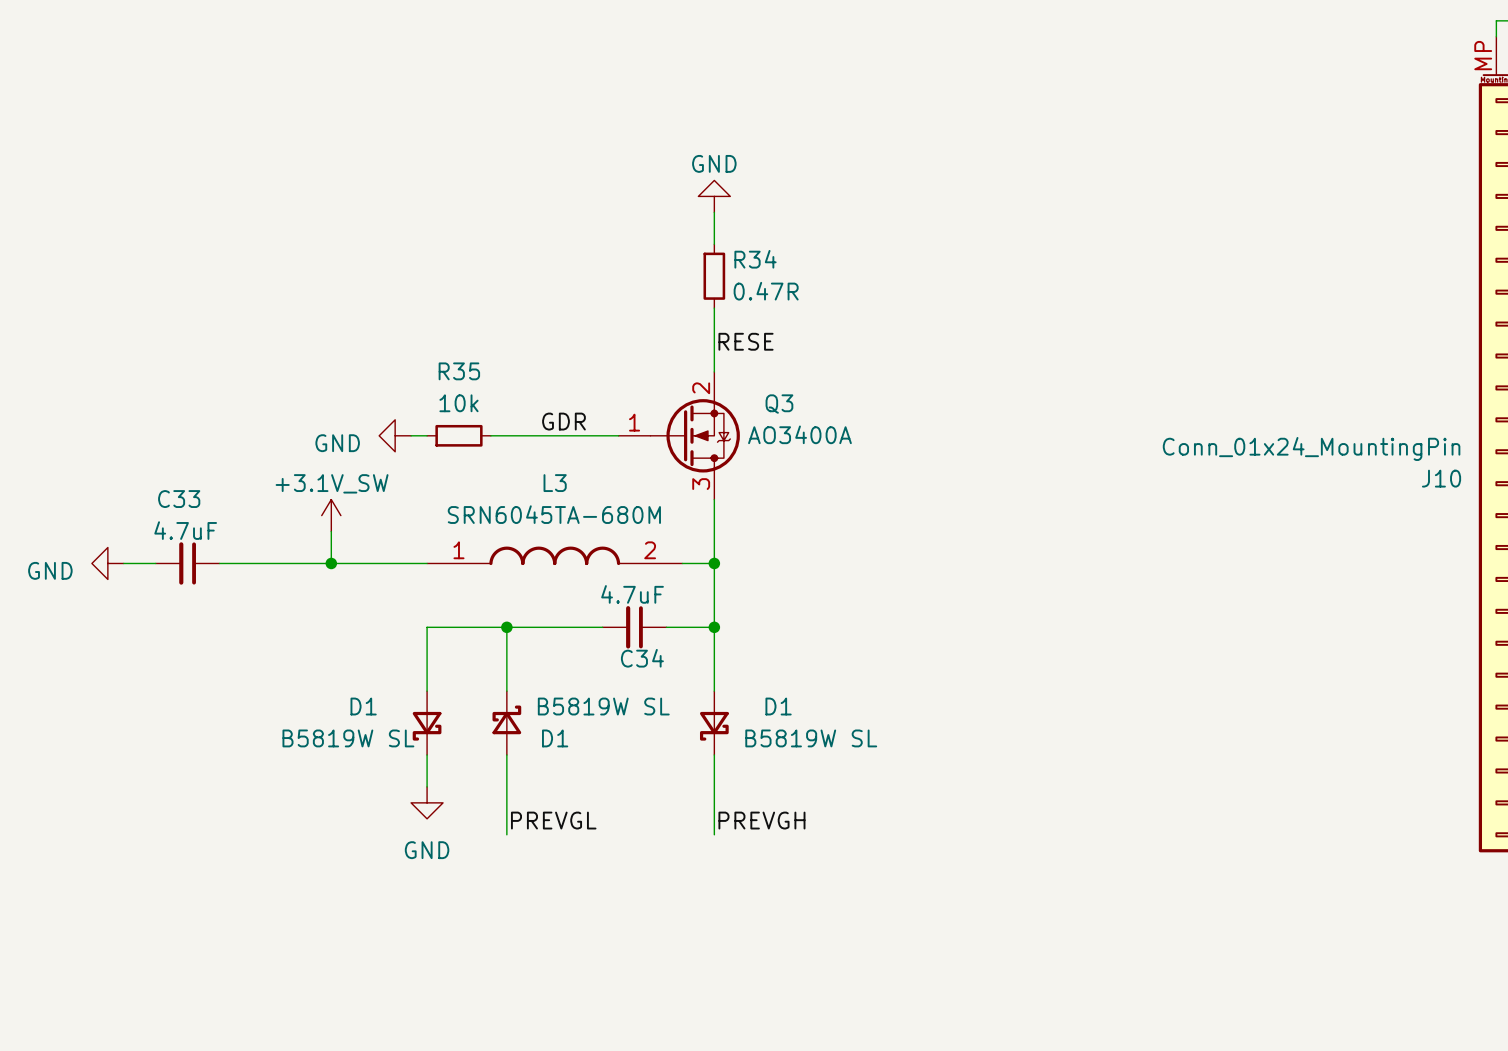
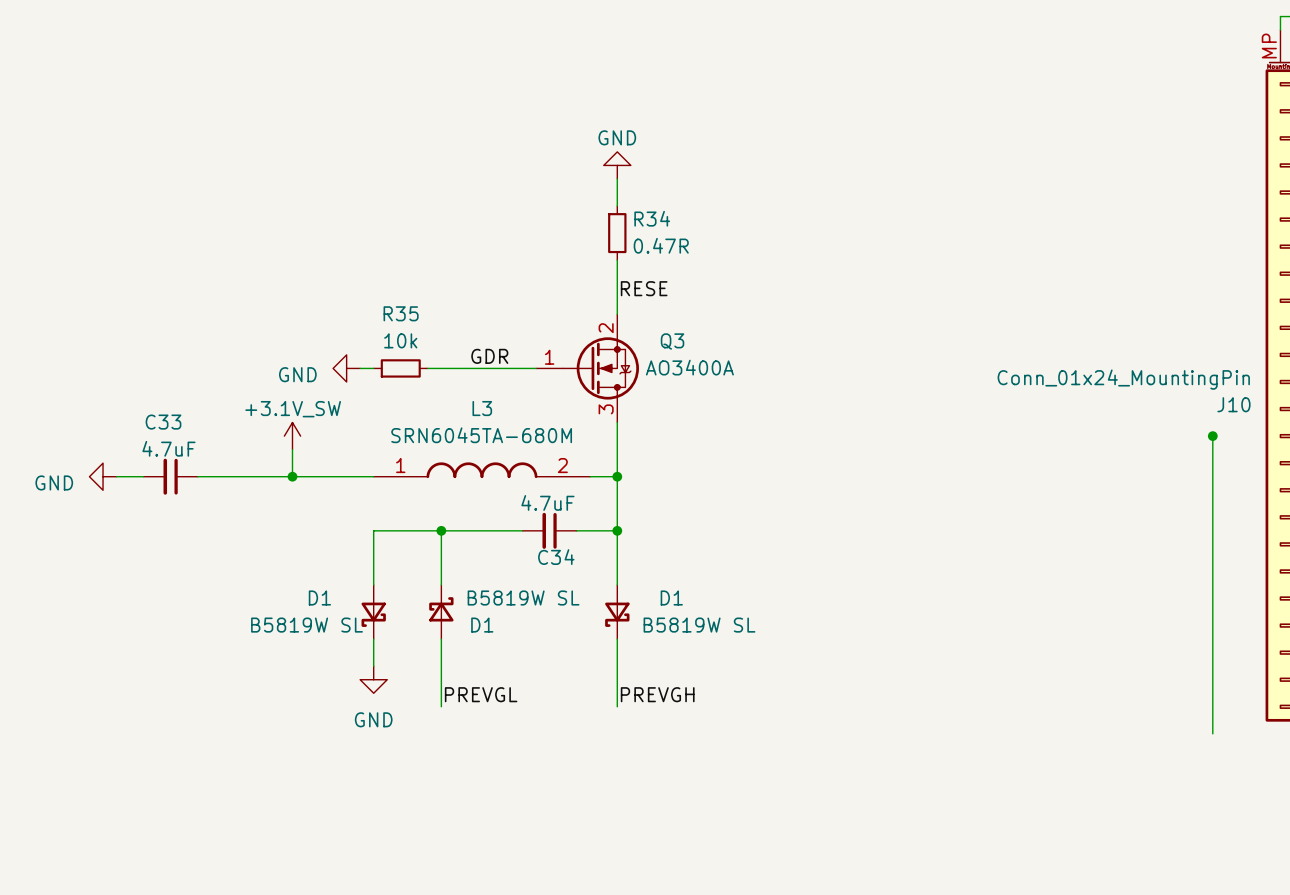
wire: none -> (1212, 436) (1212, 733)
junction: none -> (1212, 436)

